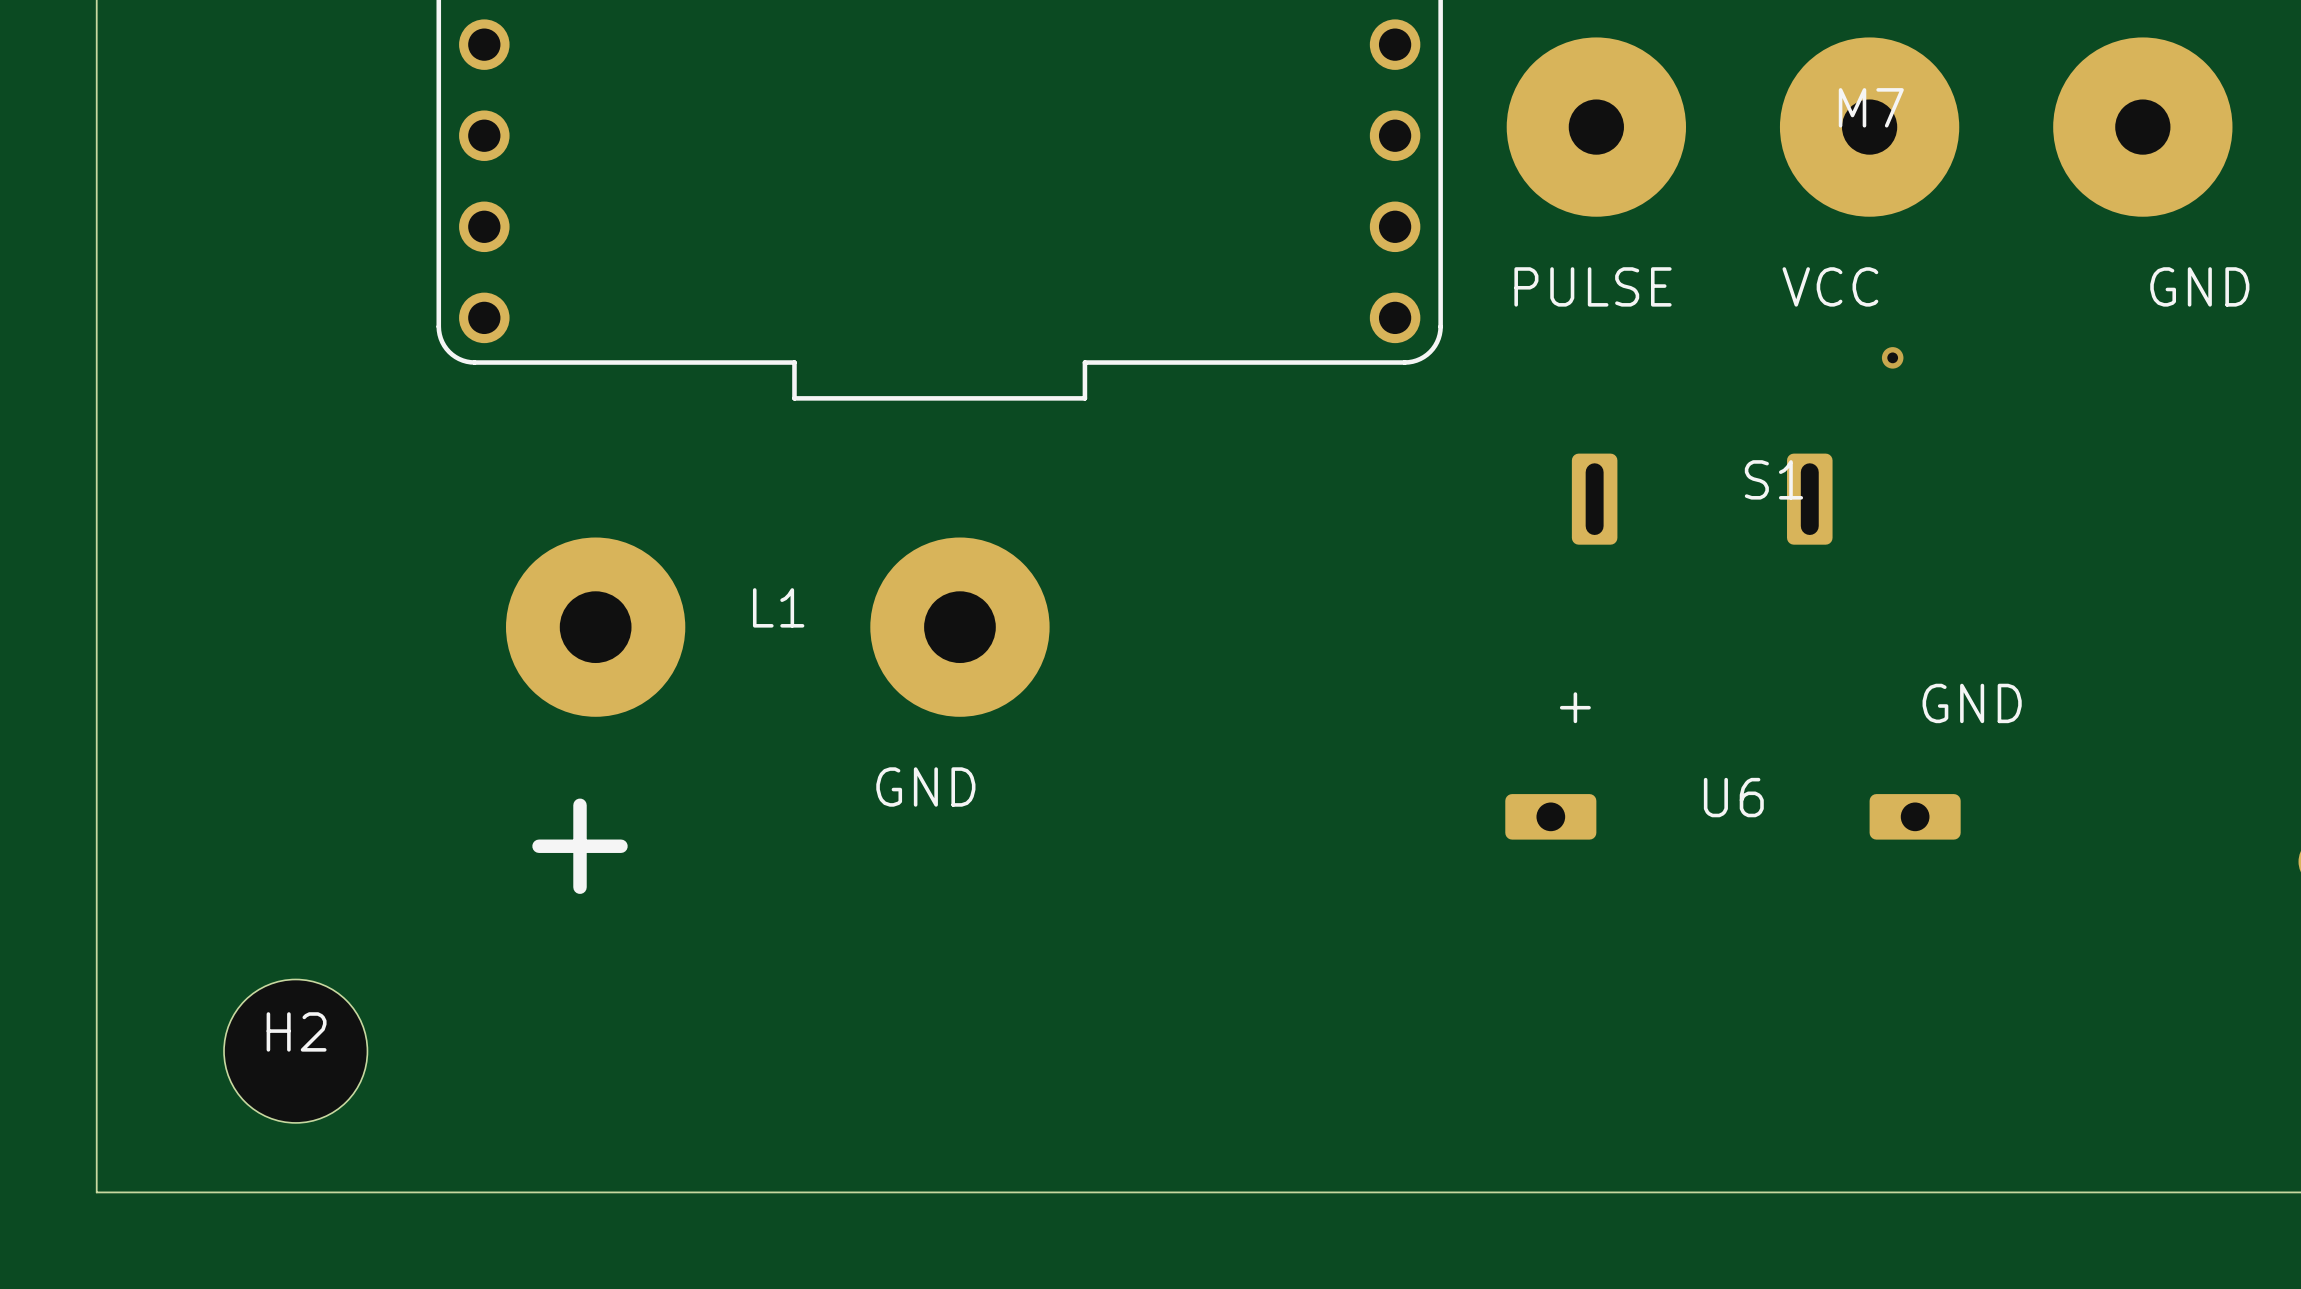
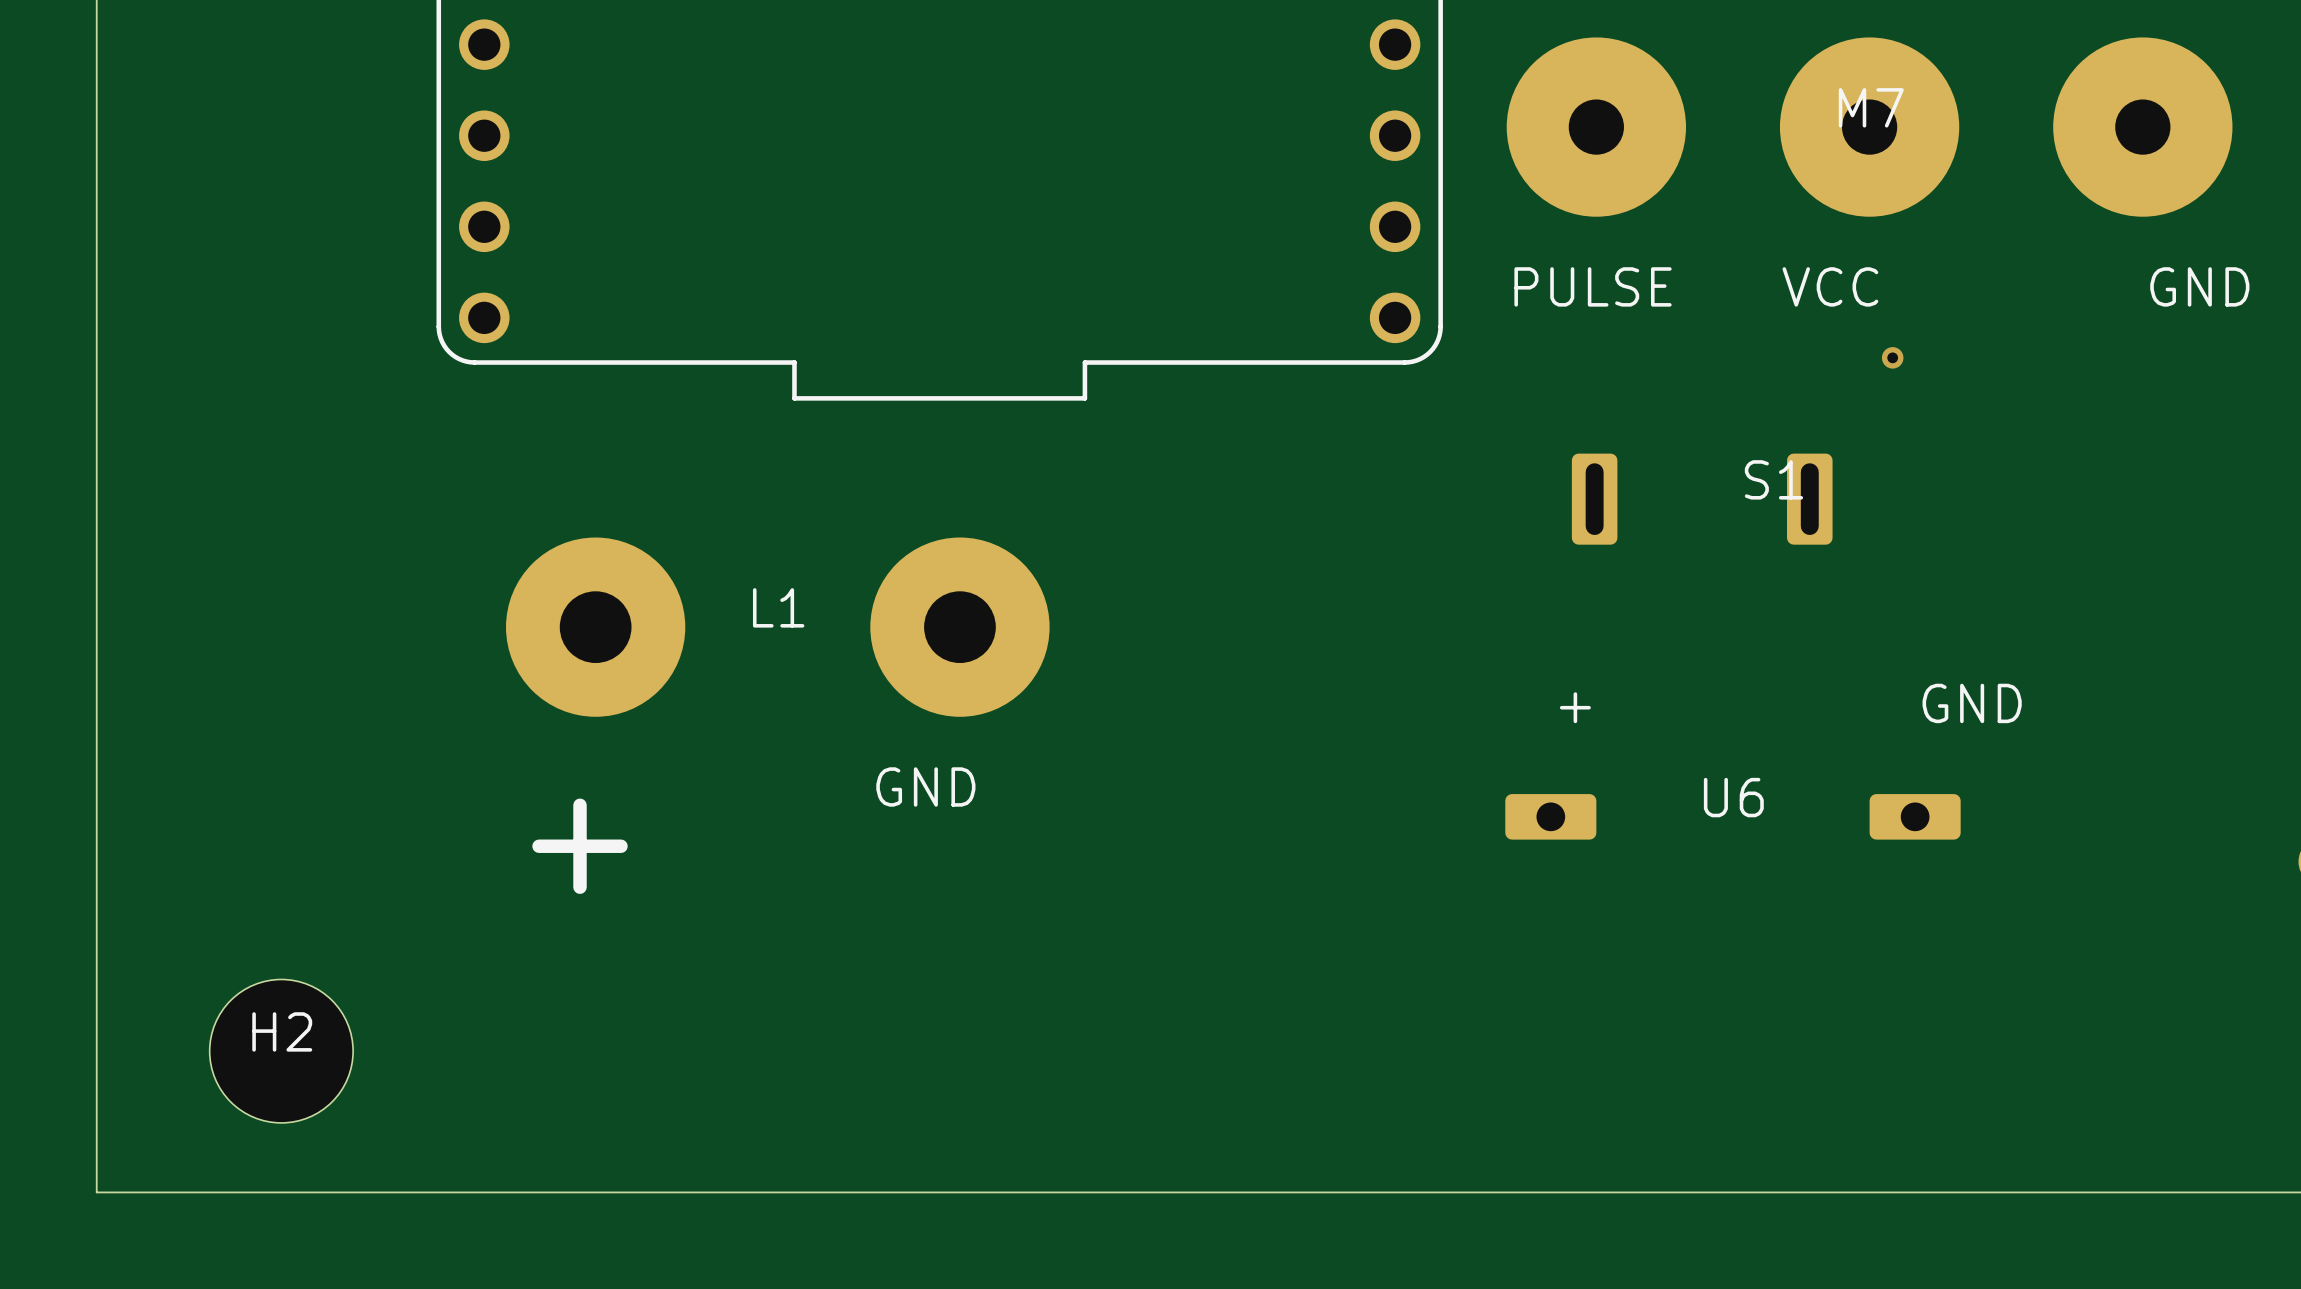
H2 position: (295, 1051) -> (281, 1051)

